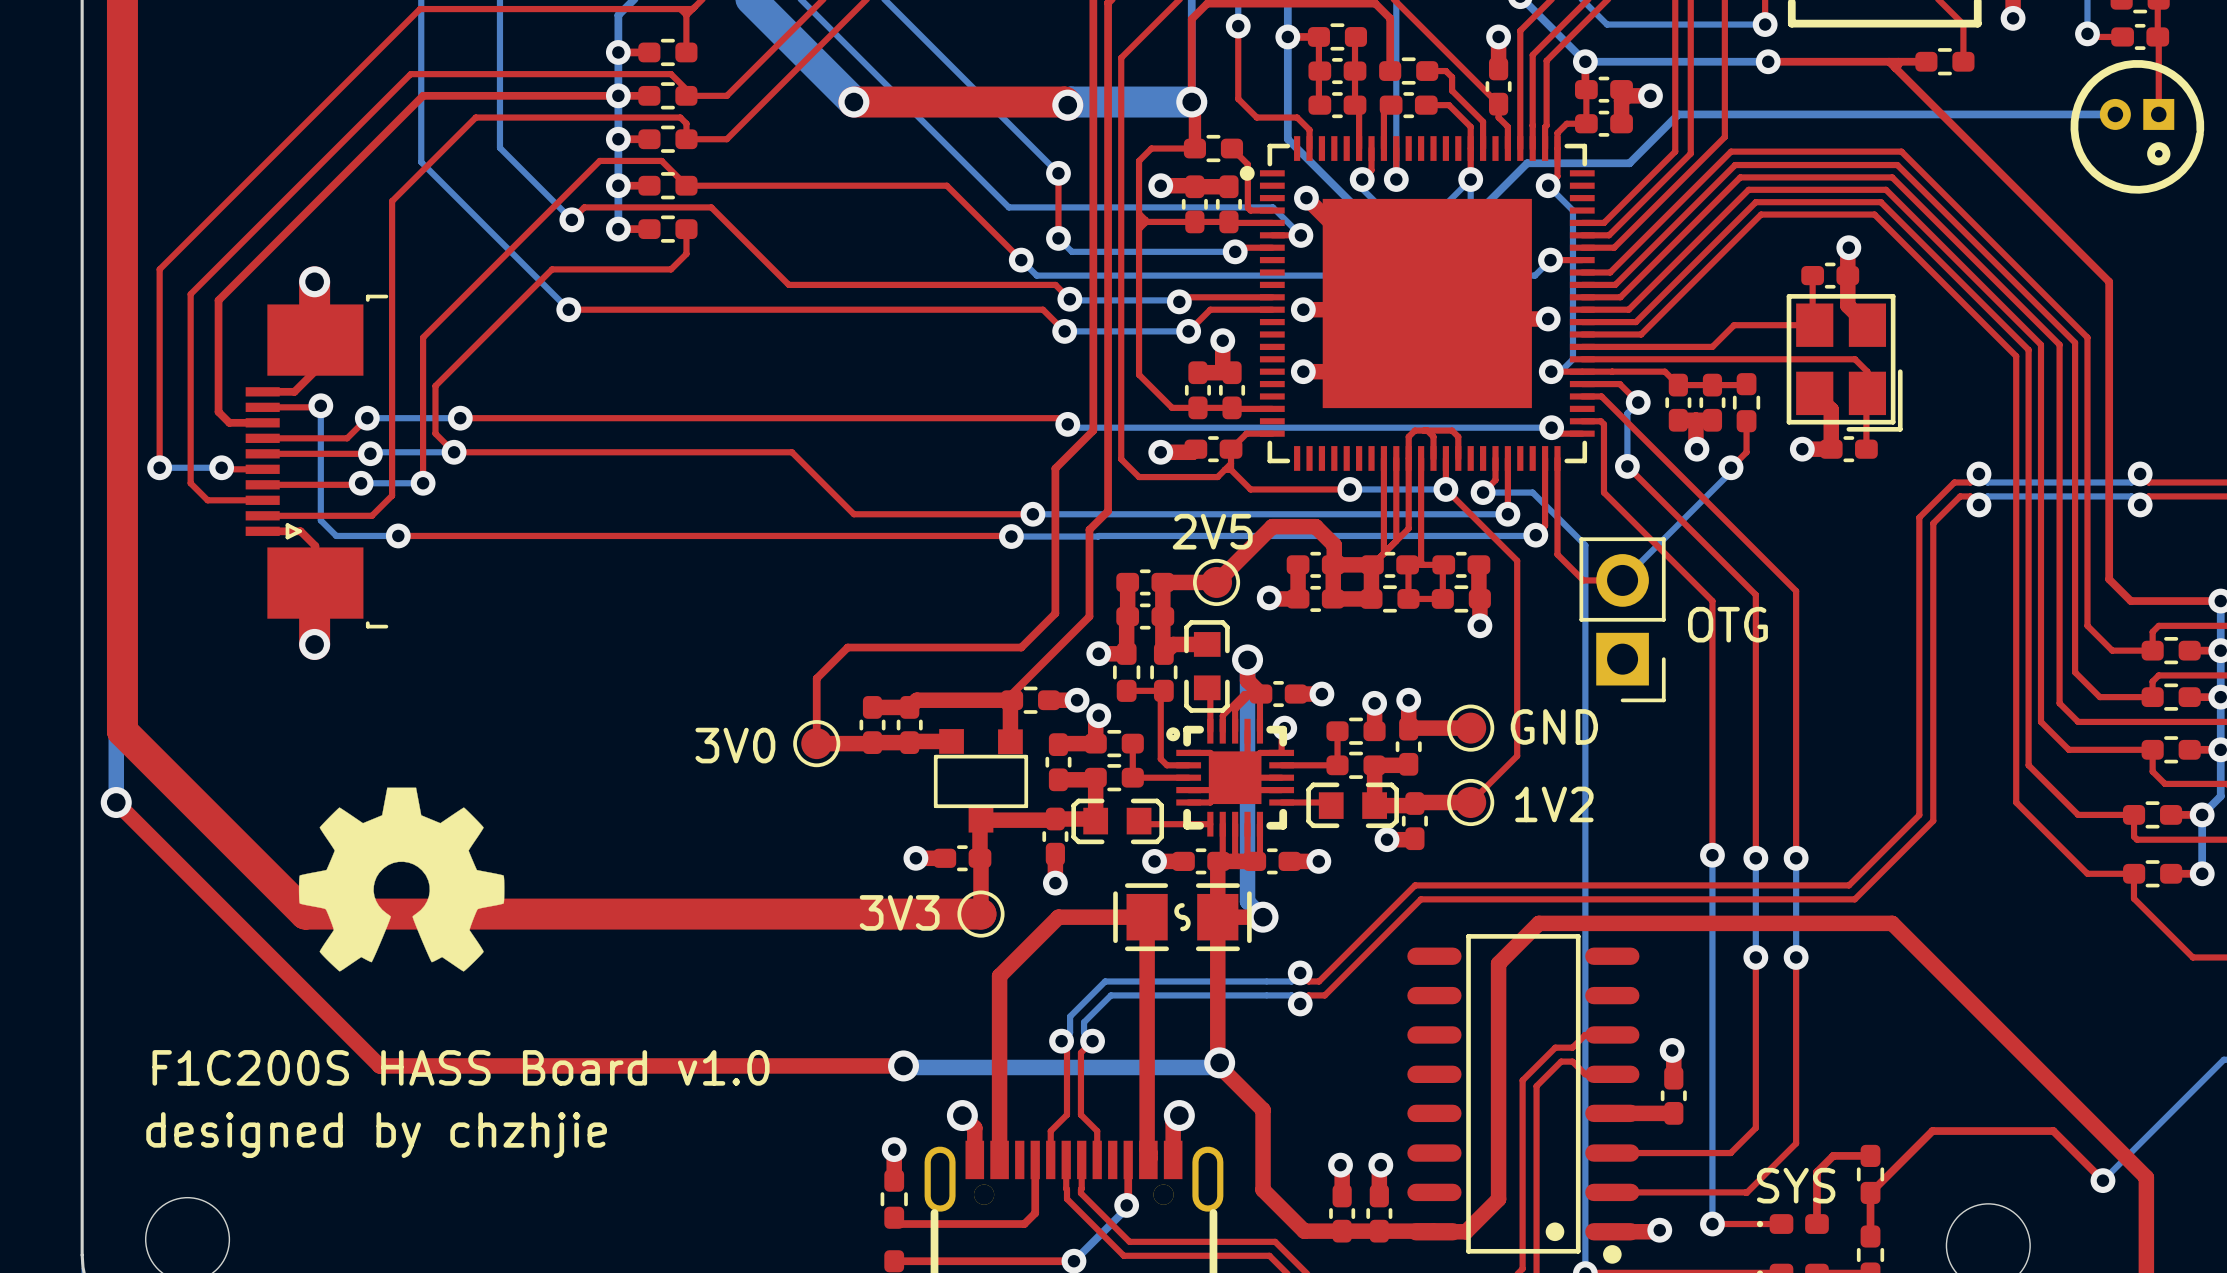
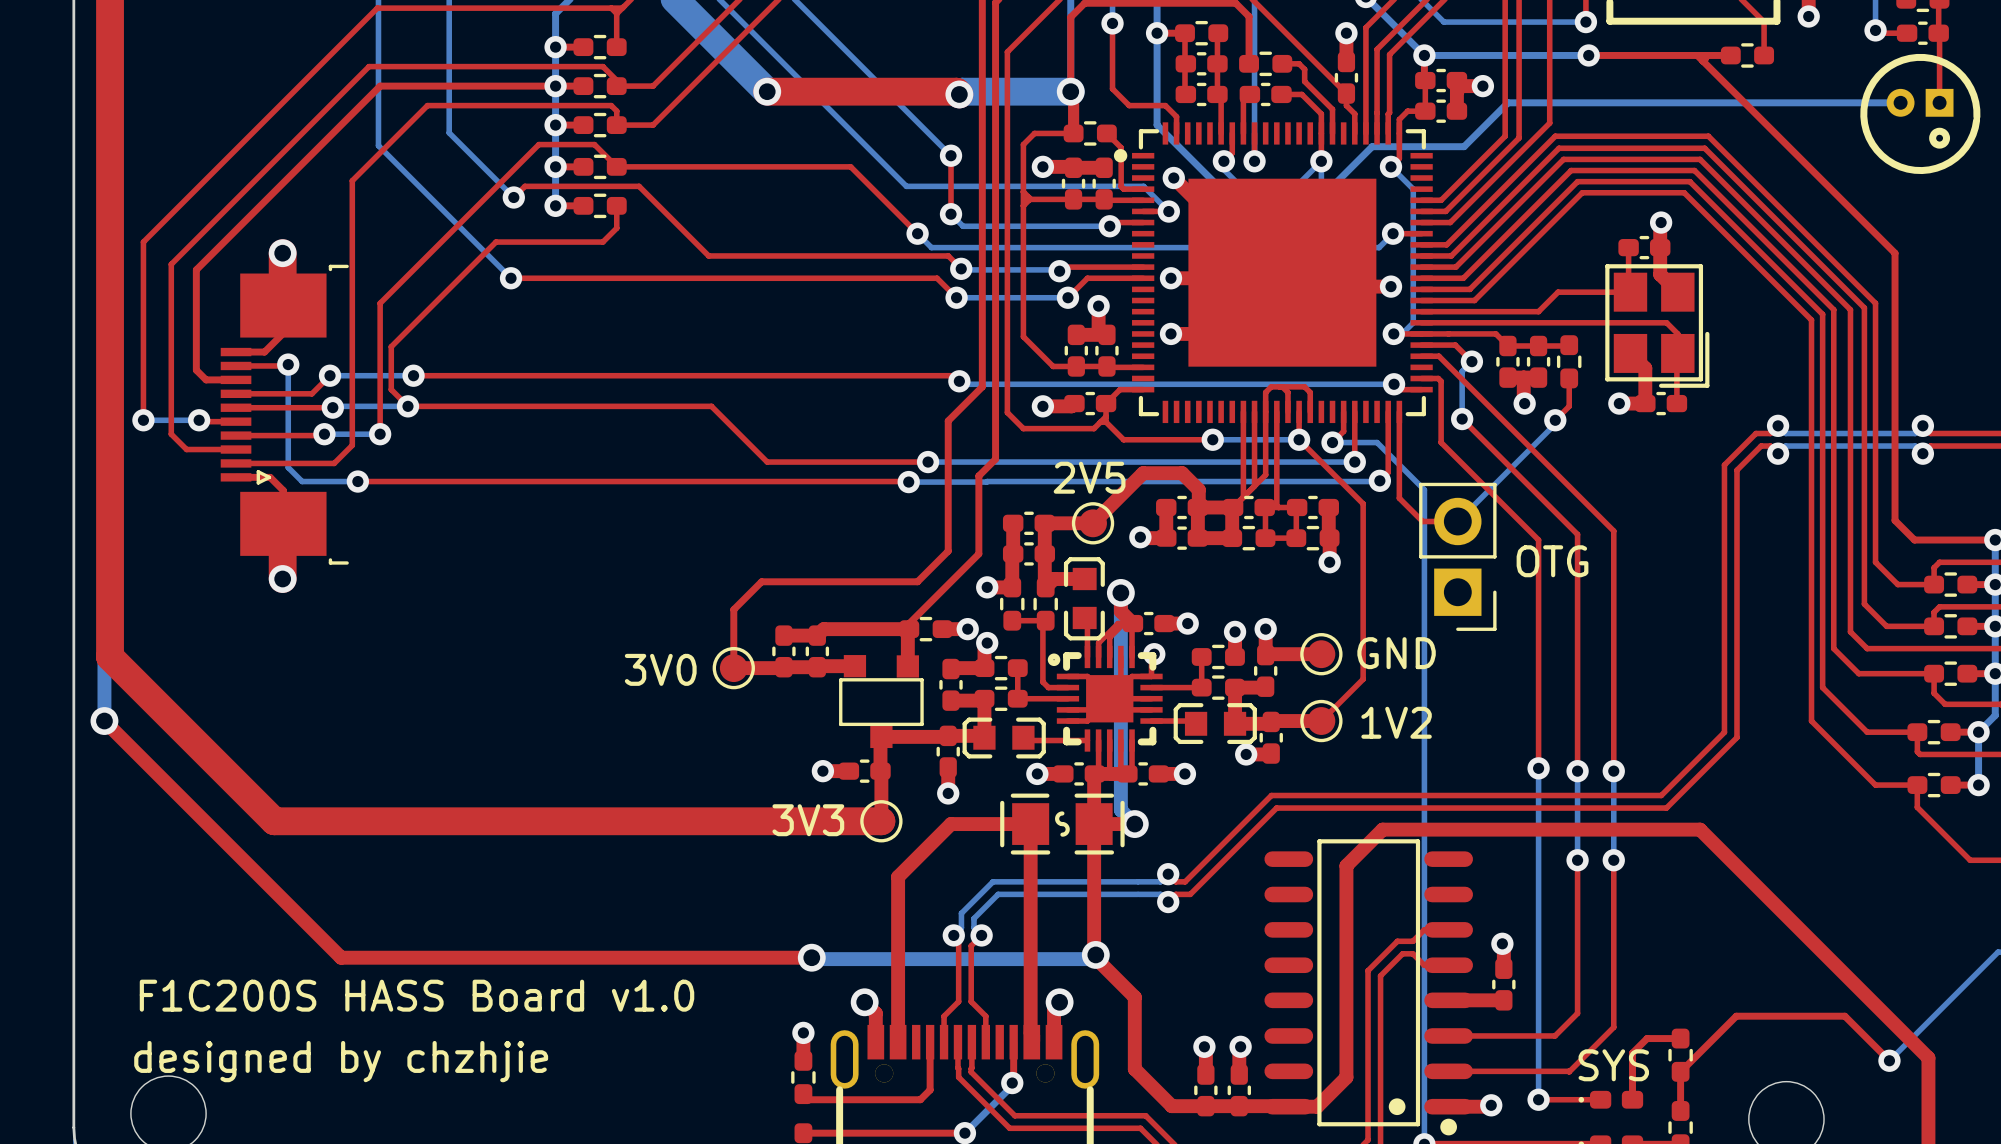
drawing: [298, 787, 505, 972] -> none
text position: F1C200S HASS Board v1.0 (461, 1067) -> F1C200S HASS Board v1.0 (417, 995)
text position: designed by chzhjie (376, 1135) -> designed by chzhjie (341, 1061)

